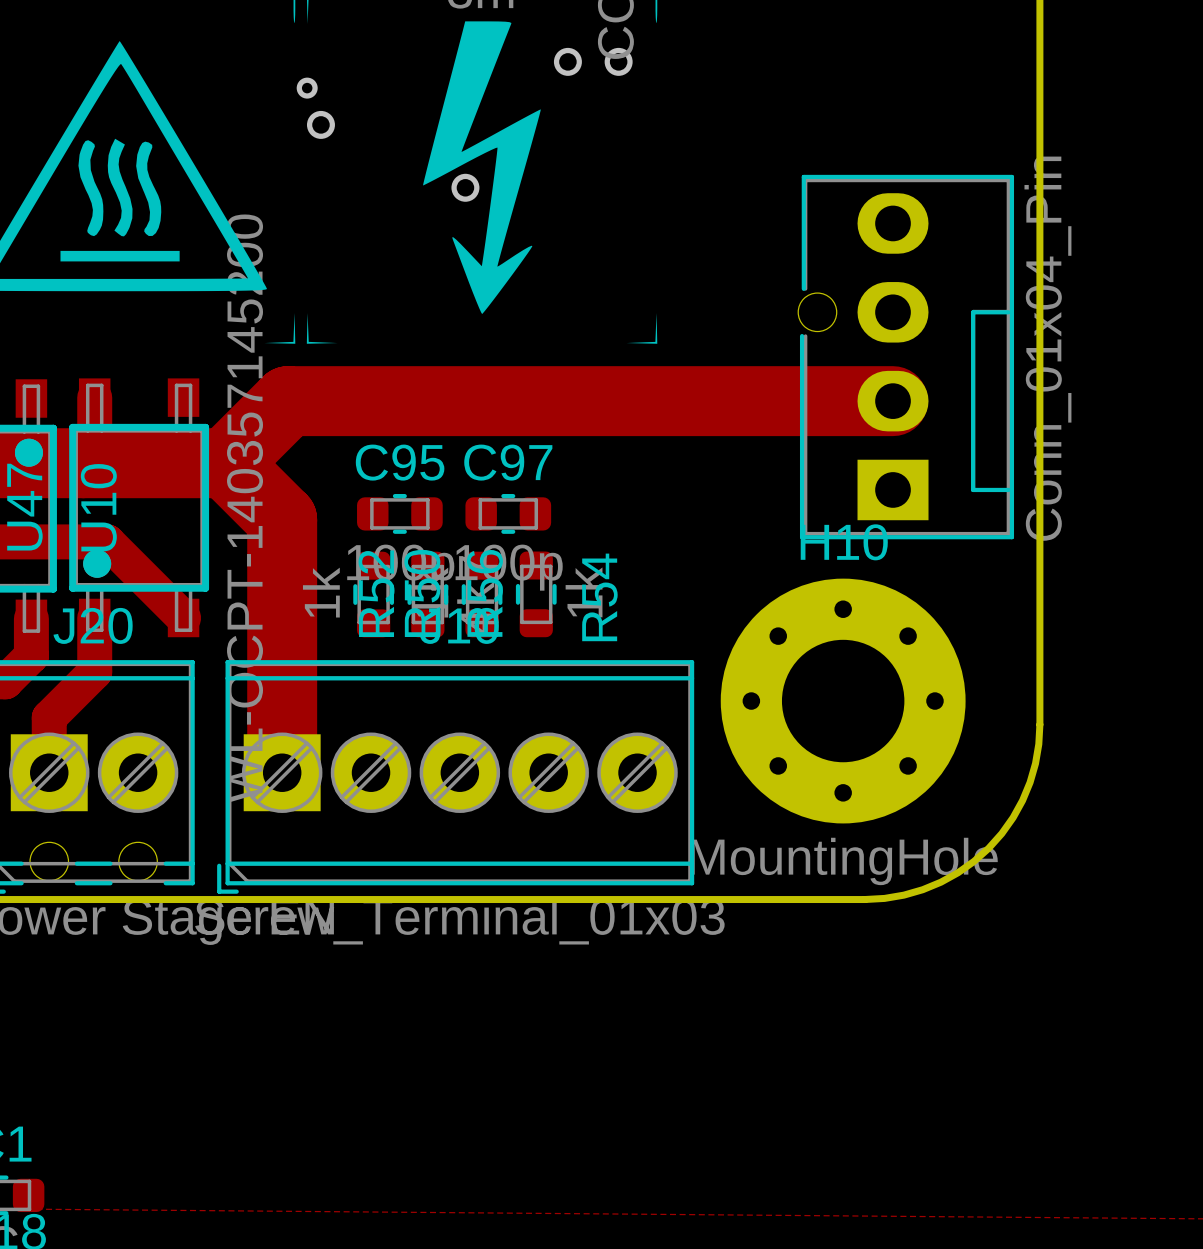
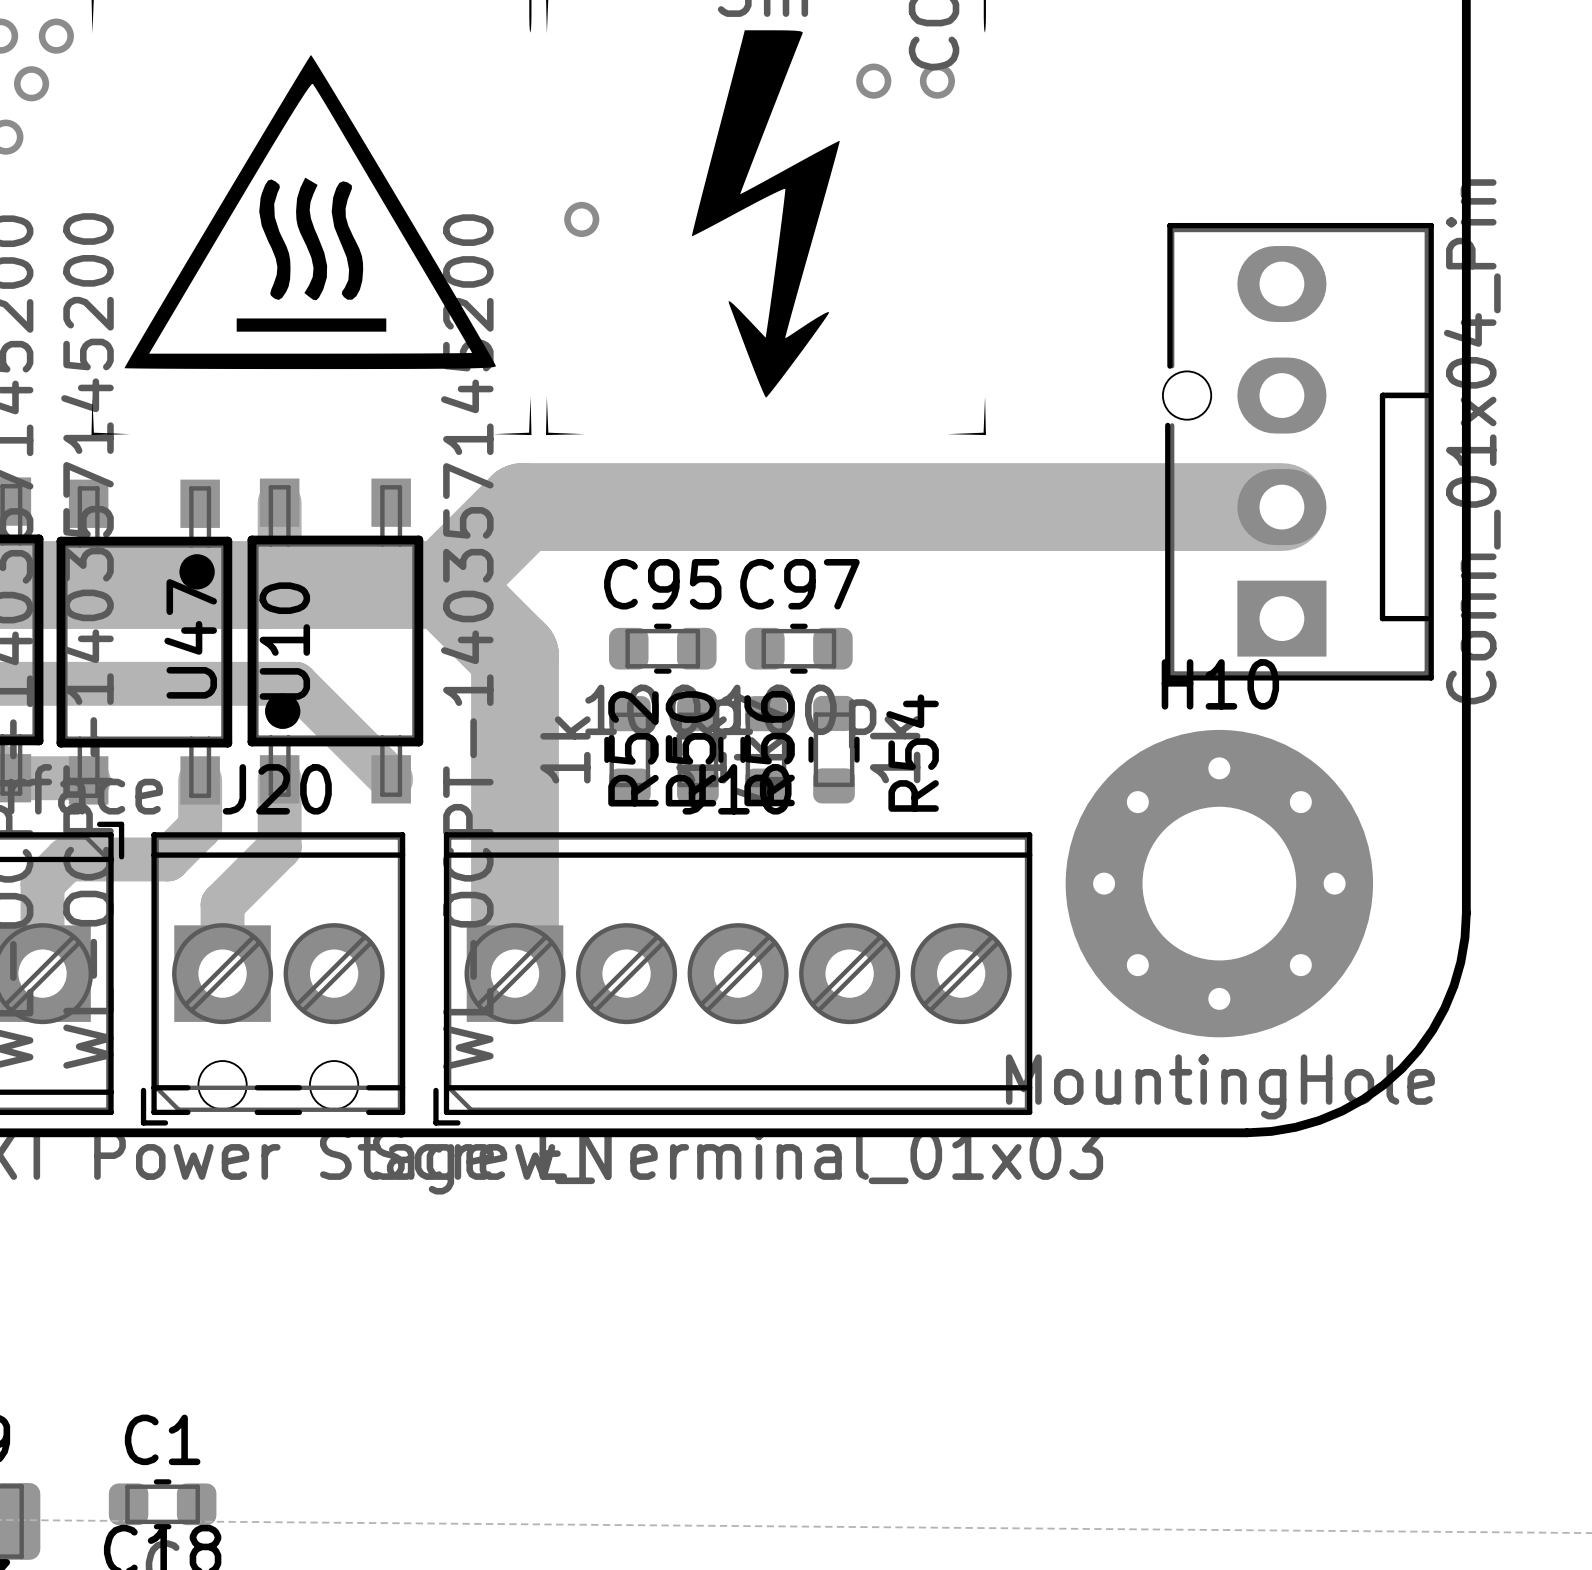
via: (307, 88) -> none
via position: (320, 124) -> (581, 219)
via: (465, 187) -> none

